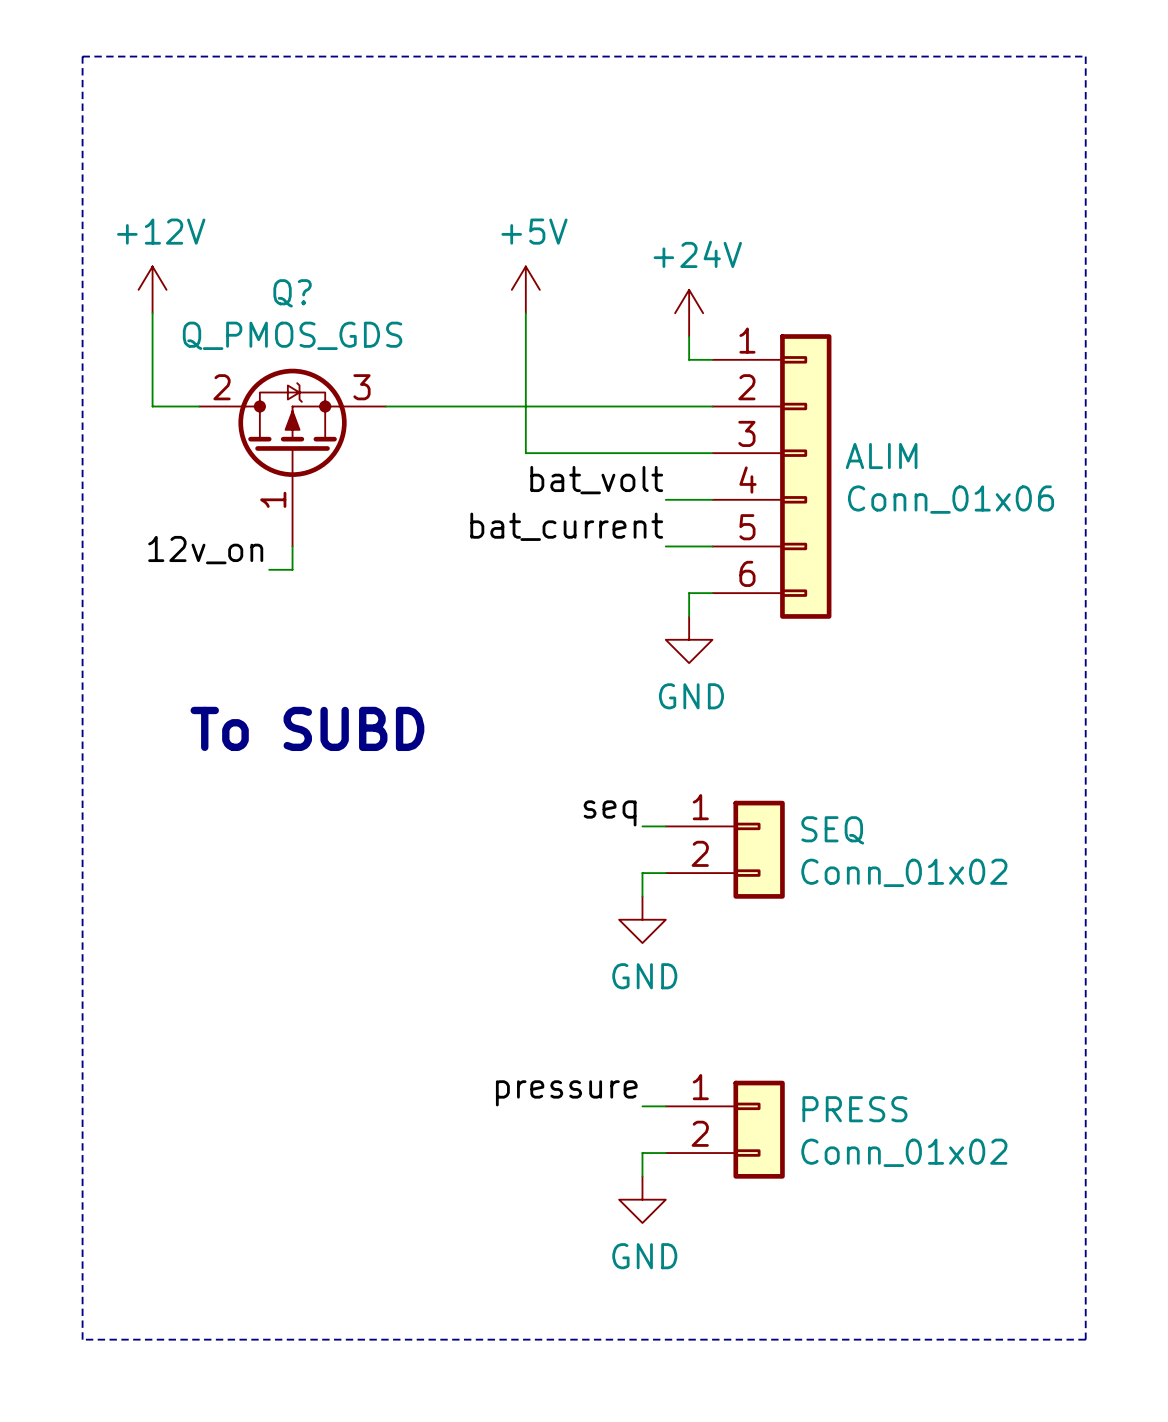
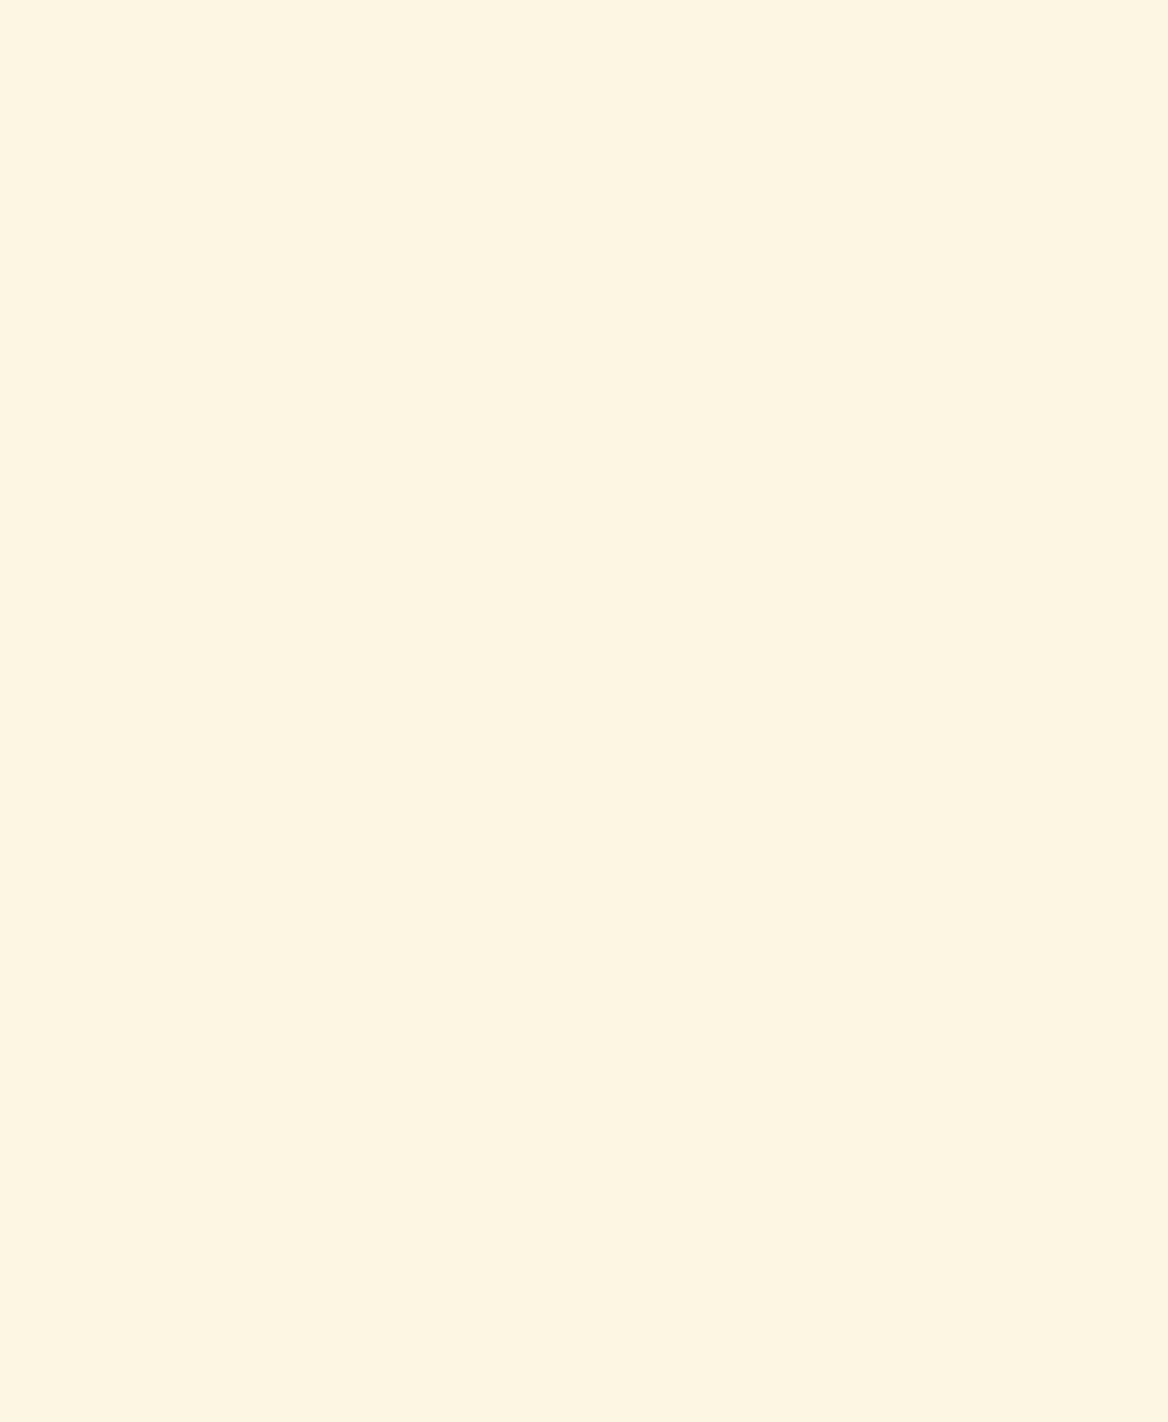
line: (82, 56) (82, 1339) (1085, 1339) (1085, 56) (82, 56) -> none
power symbol: +12V (152, 289) -> none
power symbol: +5V (525, 289) -> none
wire: (152, 313) (152, 406) (199, 406) -> none
wire: (525, 313) (525, 453) (712, 453) -> none
power symbol: +24V (689, 313) -> none
wire: (689, 336) (689, 359) (712, 359) -> none
wire: (385, 406) (712, 406) -> none
Q?: Q_PMOS_GDS (292, 457) -> none
ALIM: Conn_01x06 (771, 476) -> none
label: bat_volt (596, 480) -> none
wire: (665, 499) (712, 499) -> none
label: bat_current (566, 526) -> none
wire: (292, 546) (292, 569) (269, 569) -> none
wire: (665, 546) (712, 546) -> none
label: 12v_on (205, 550) -> none
wire: (712, 593) (689, 593) (689, 616) -> none
power symbol: GND (689, 639) -> none
text: To SUBD (307, 728) -> none
label: seq (610, 813) -> none
wire: (642, 826) (665, 826) -> none
SEQ: Conn_01x02 (725, 849) -> none
wire: (665, 873) (642, 873) (642, 896) -> none
power symbol: GND (642, 919) -> none
label: pressure (566, 1093) -> none
wire: (642, 1106) (665, 1106) -> none
PRESS: Conn_01x02 (725, 1129) -> none
wire: (665, 1153) (642, 1153) (642, 1176) -> none
power symbol: GND (642, 1199) -> none

